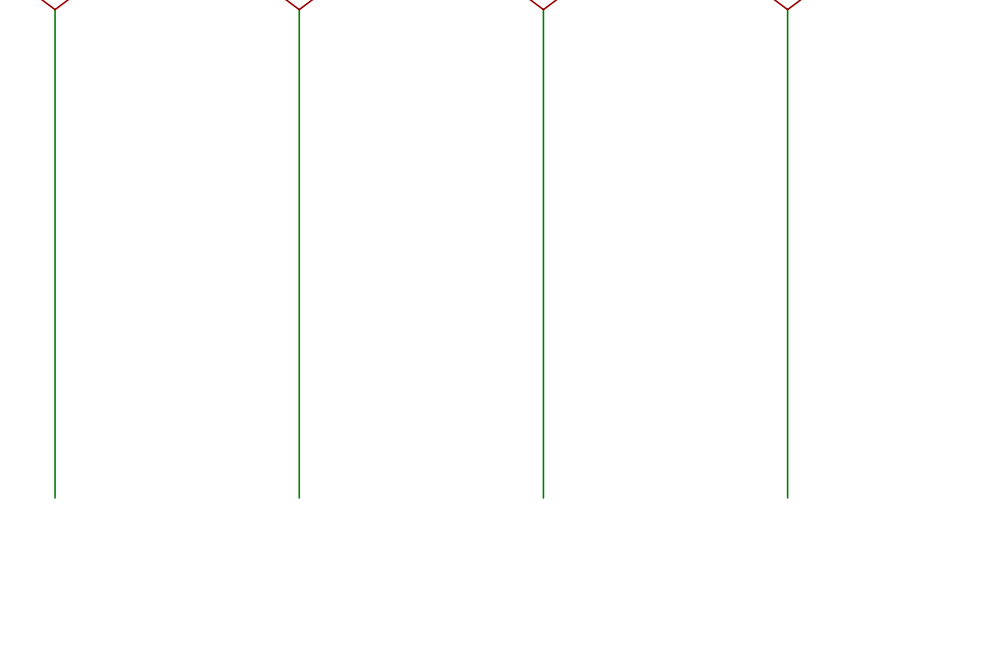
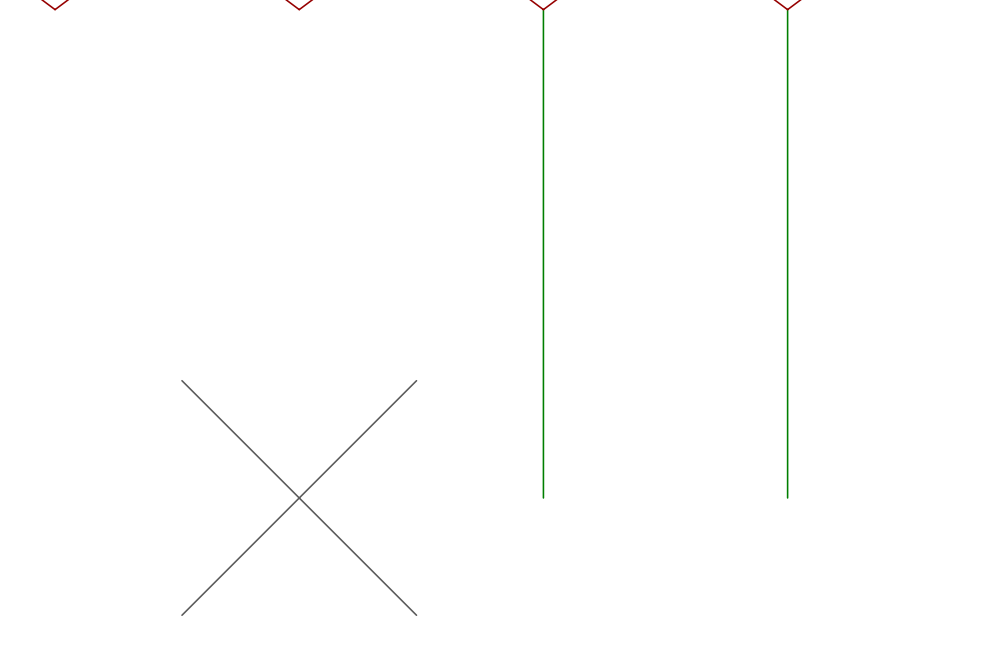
wire: (55, 9) (55, 497) -> none
wire: (299, 9) (299, 497) -> none
no-connect mark: none -> (299, 497)

